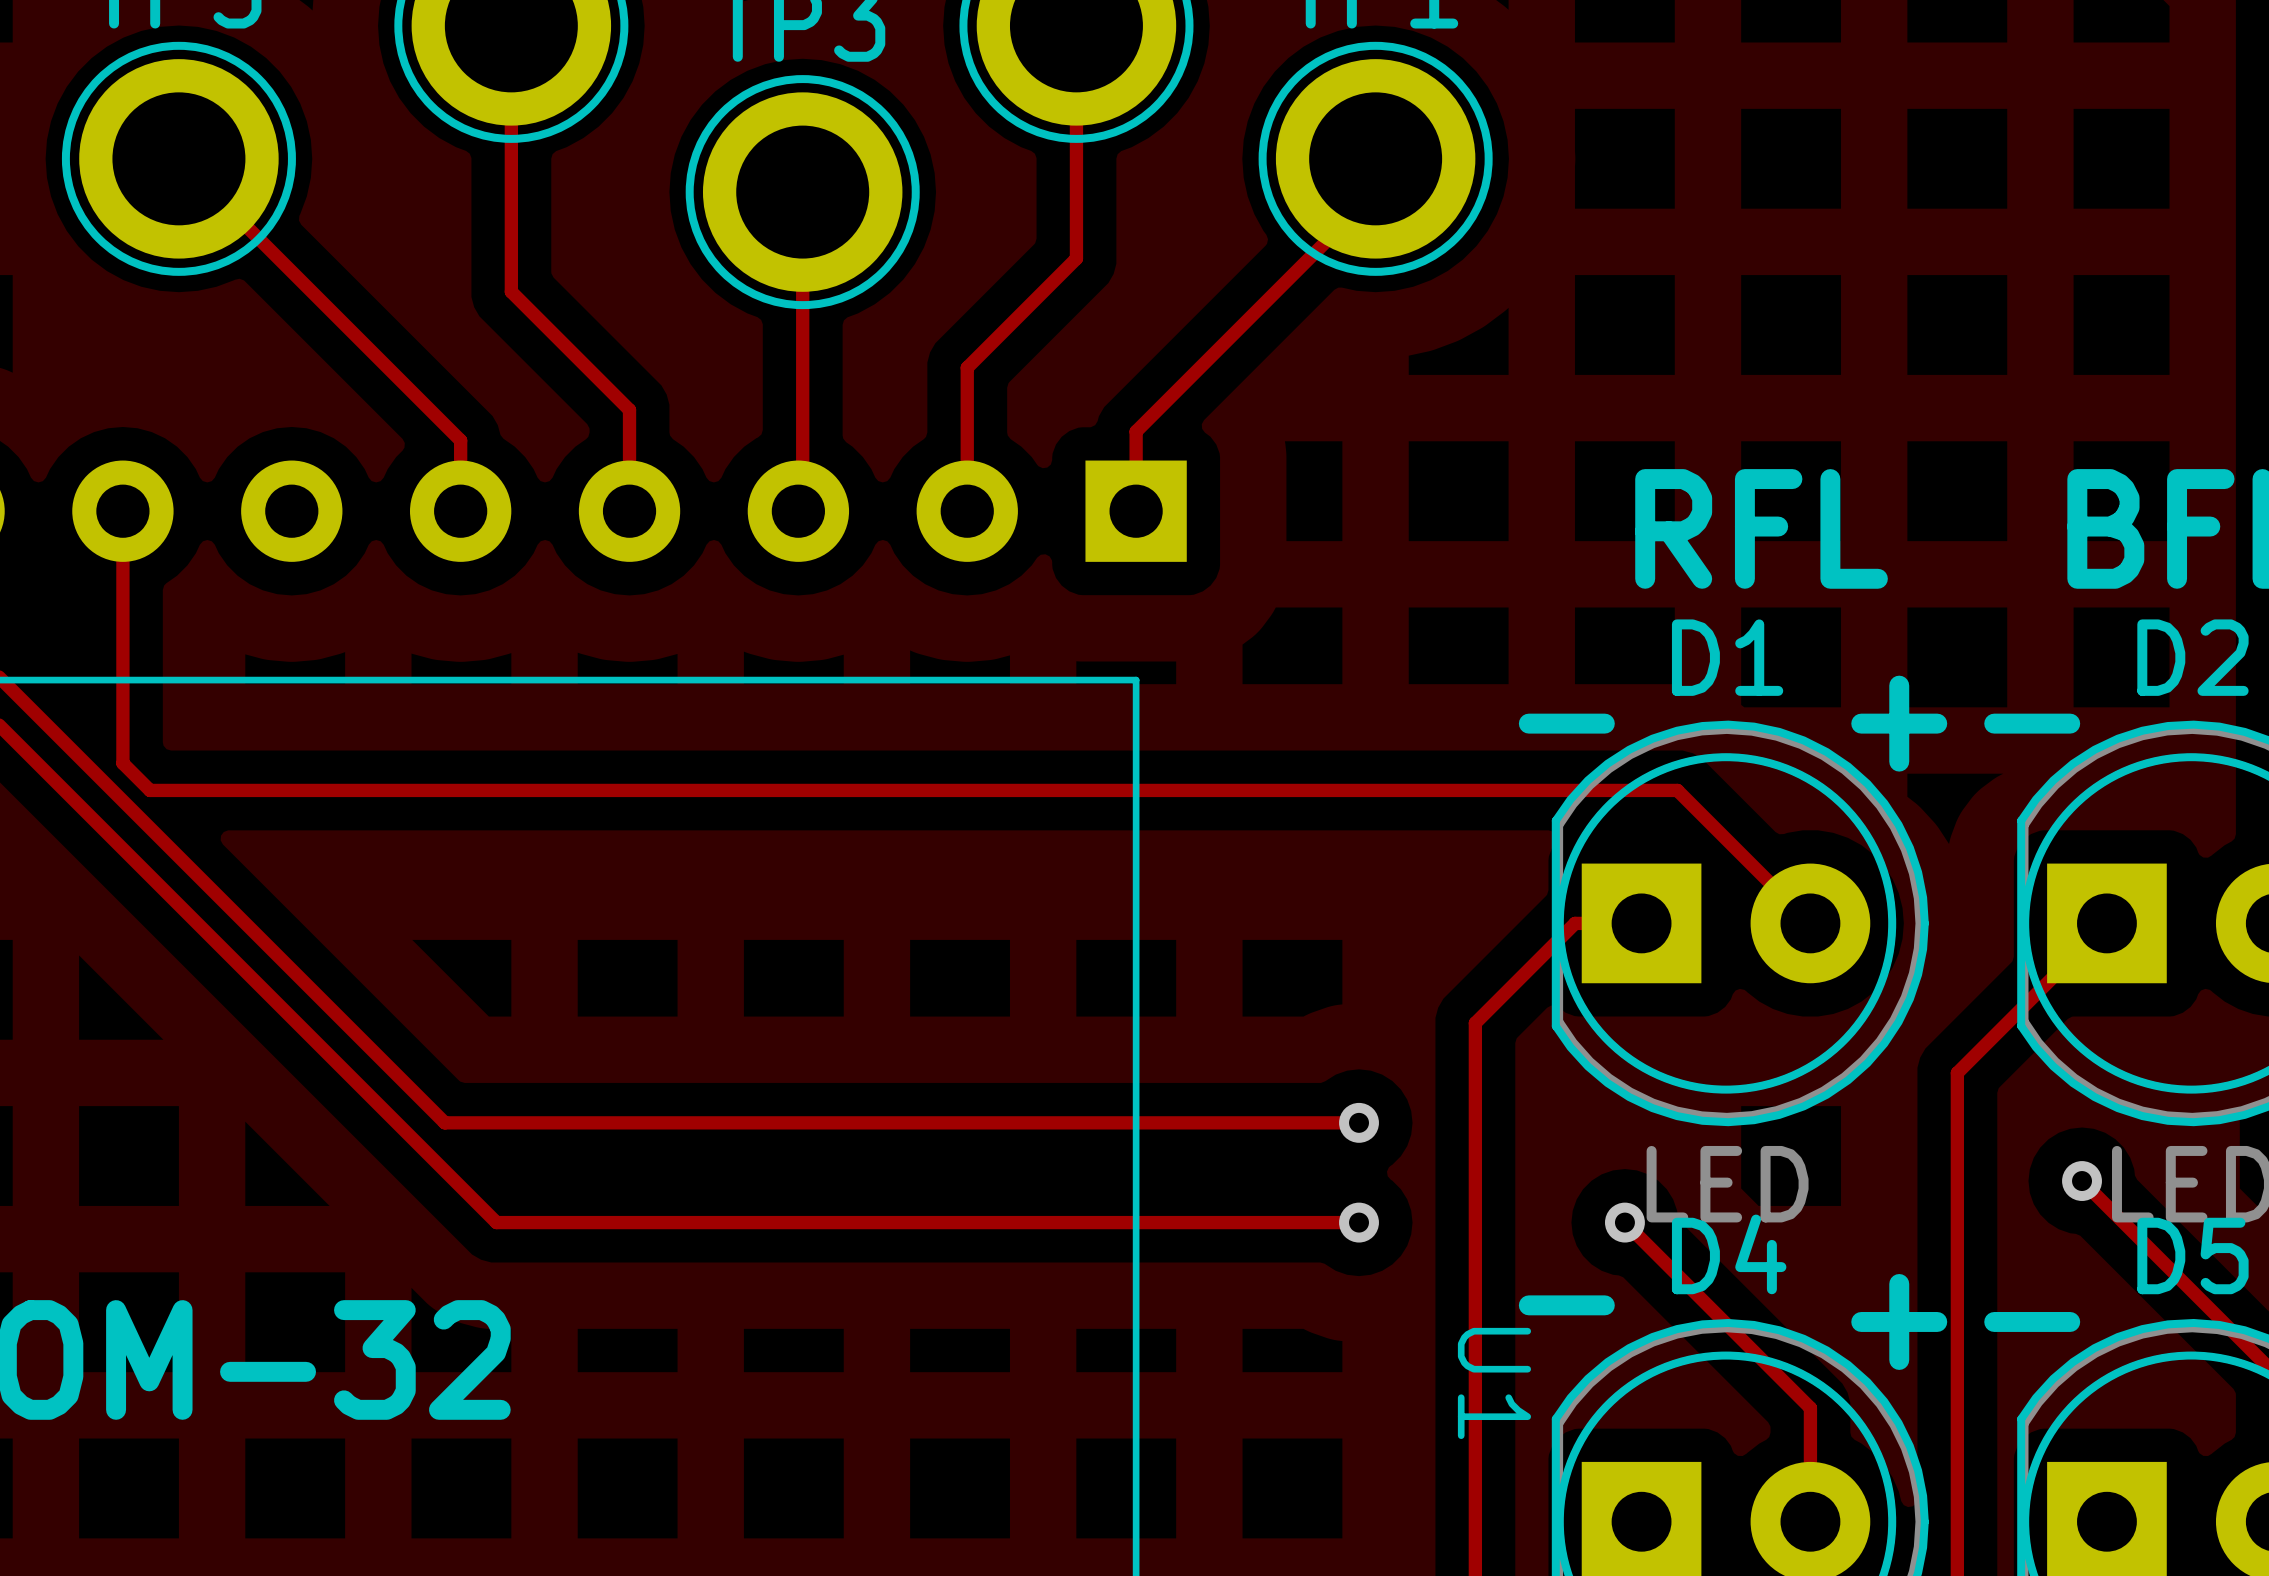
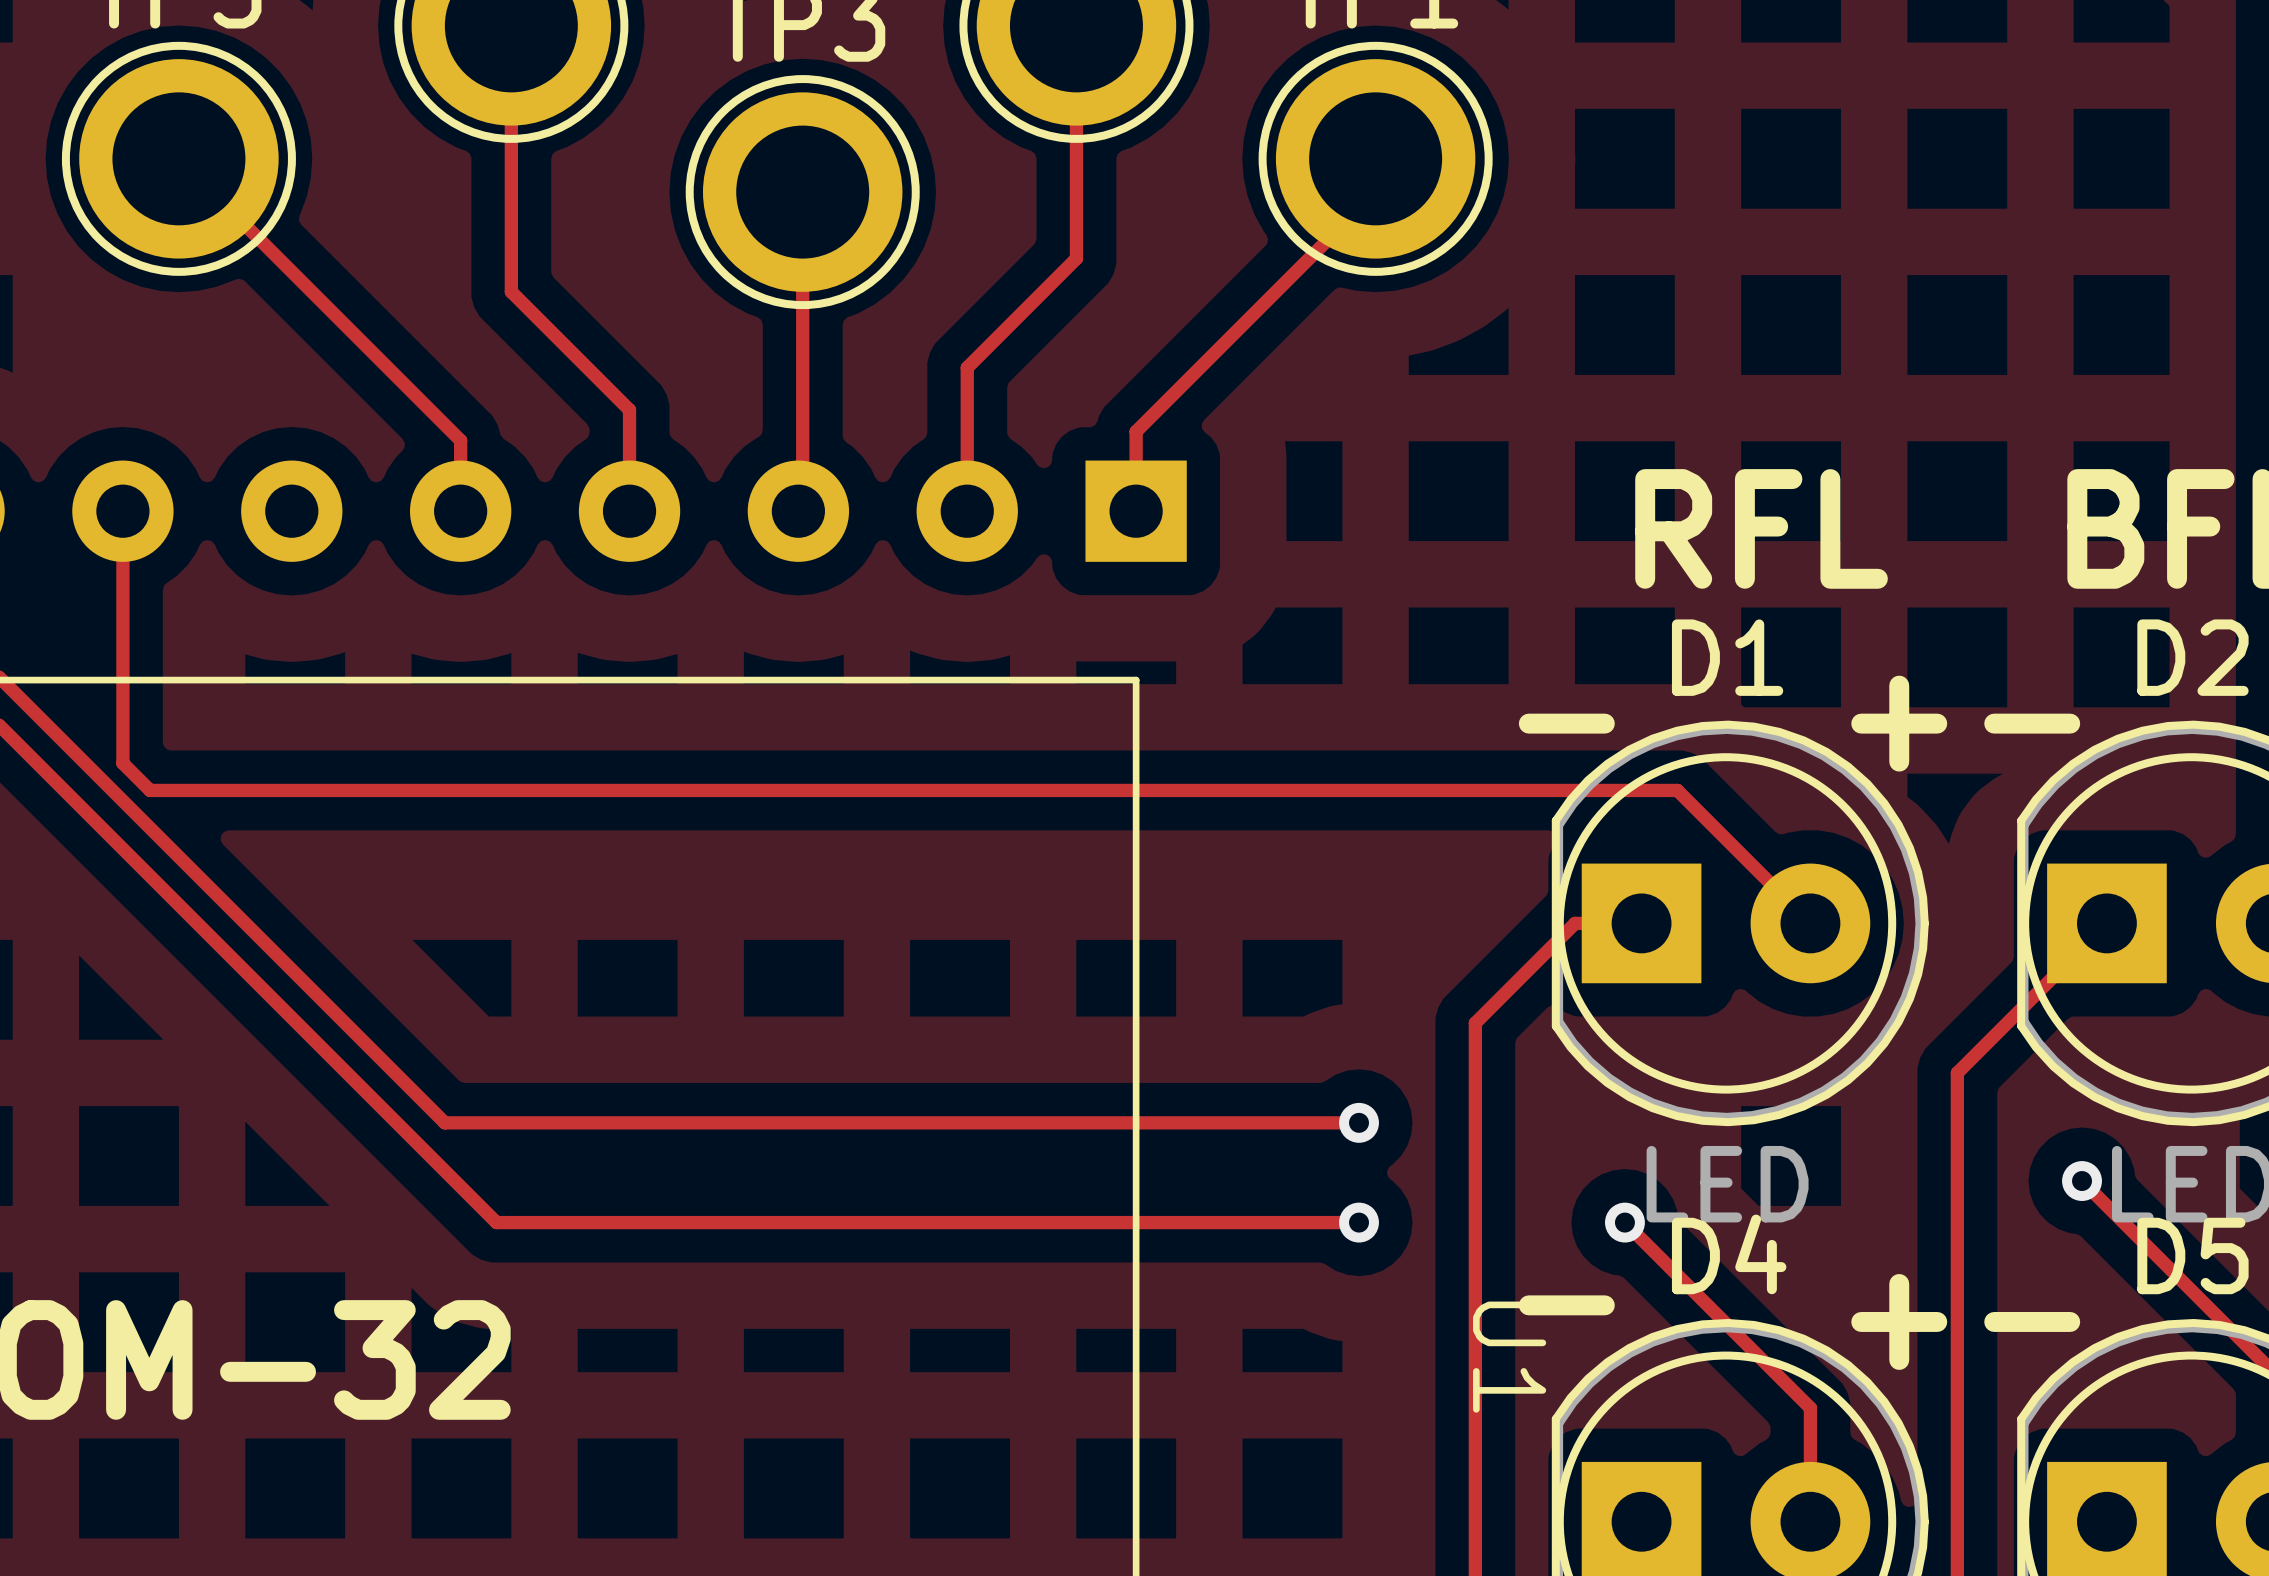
U1 name position: U1 (1494, 1383) -> U1 (1509, 1357)

